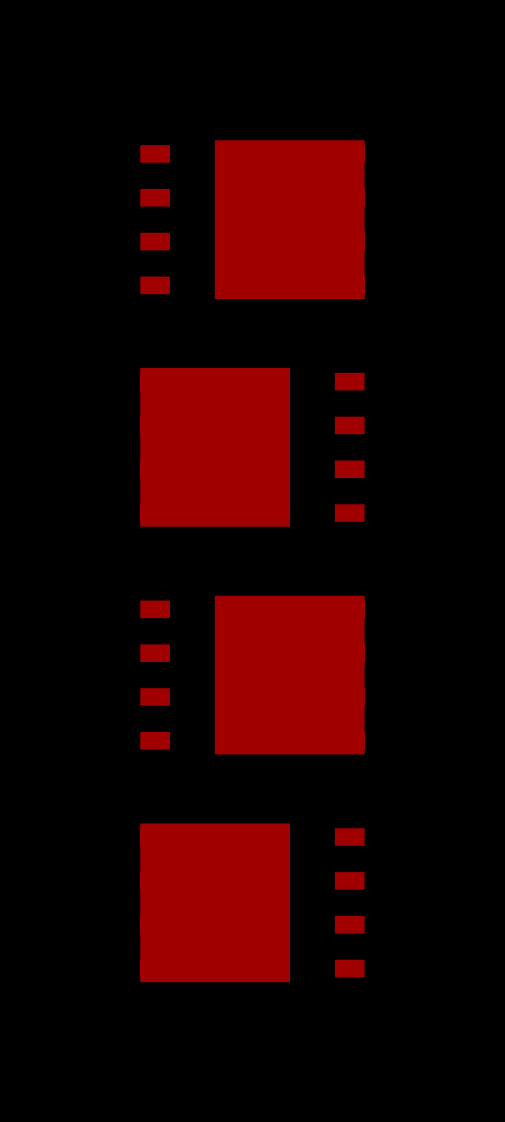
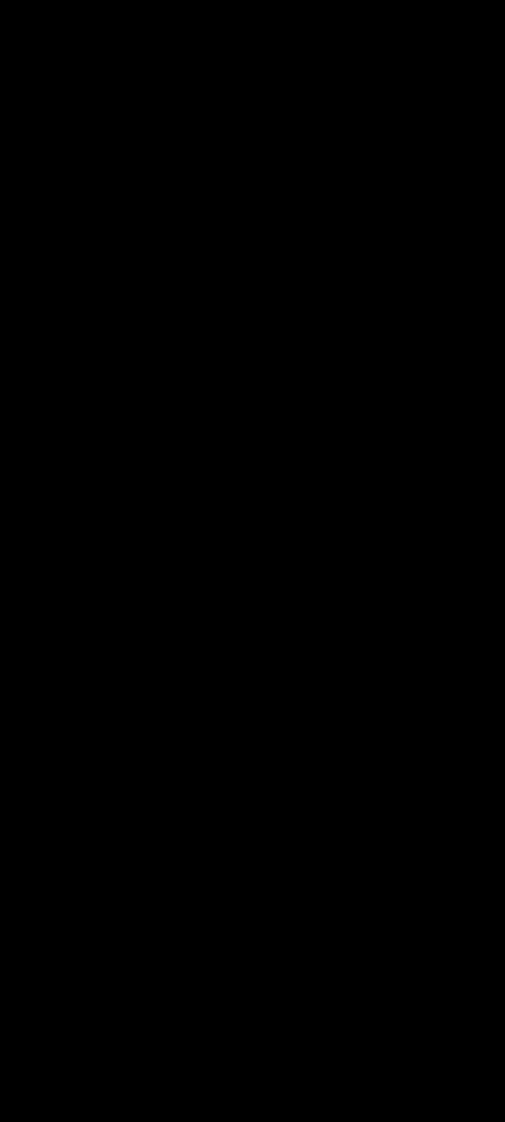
part: (252, 219) -> none
part: (252, 447) -> none
part: (252, 675) -> none
part: (252, 902) -> none

